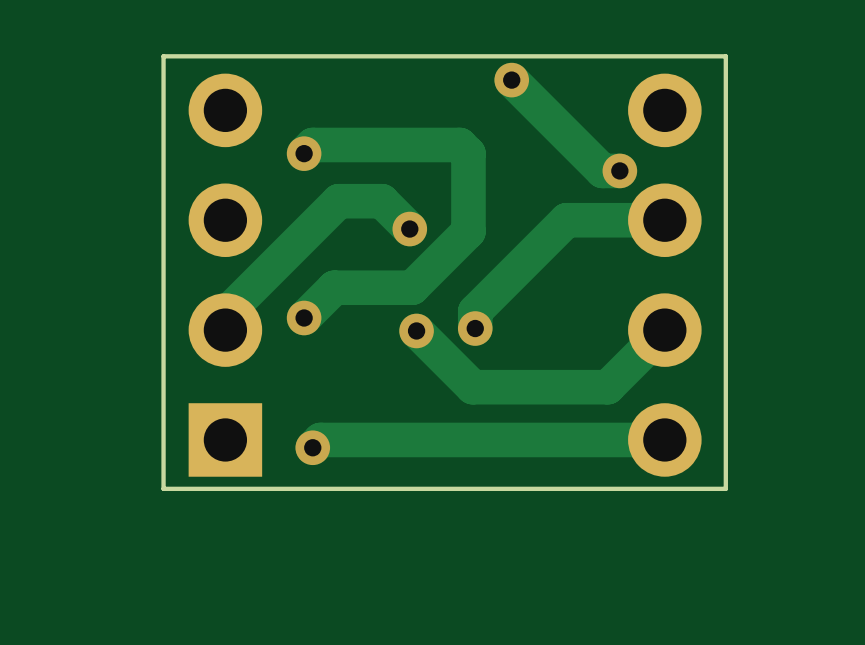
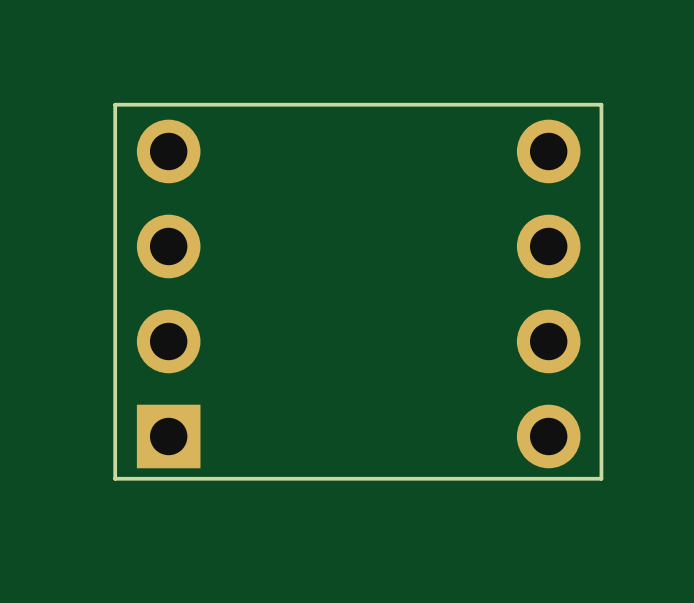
track: (511, 80) (602, 170) (619, 170) -> none
via: (511, 80) -> none
track: (304, 153) (312, 144) (459, 144) (468, 153) (468, 231) (412, 287) (334, 287) (304, 317) -> none
via: (304, 153) -> none
via: (619, 170) -> none
track: (664, 220) (566, 220) (475, 311) (475, 328) -> none
track: (409, 229) (381, 201) (338, 201) (225, 314) (225, 330) -> none
via: (409, 229) -> none
via: (304, 317) -> none
via: (475, 328) -> none
via: (416, 330) -> none
track: (664, 330) (607, 387) (472, 387) (416, 330) -> none
track: (664, 439) (320, 439) (312, 447) -> none
via: (312, 447) -> none

